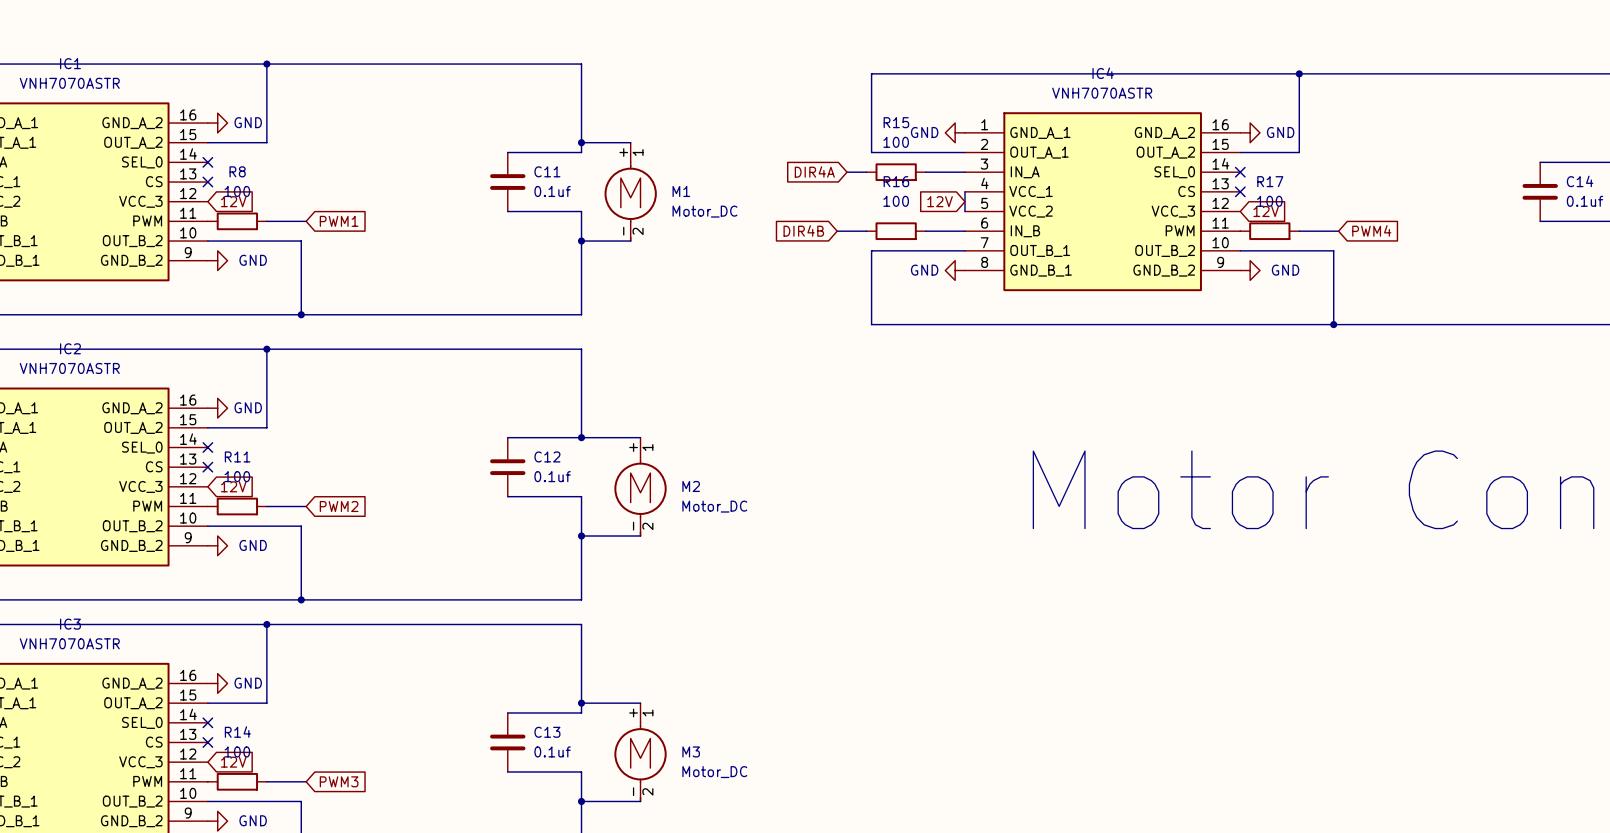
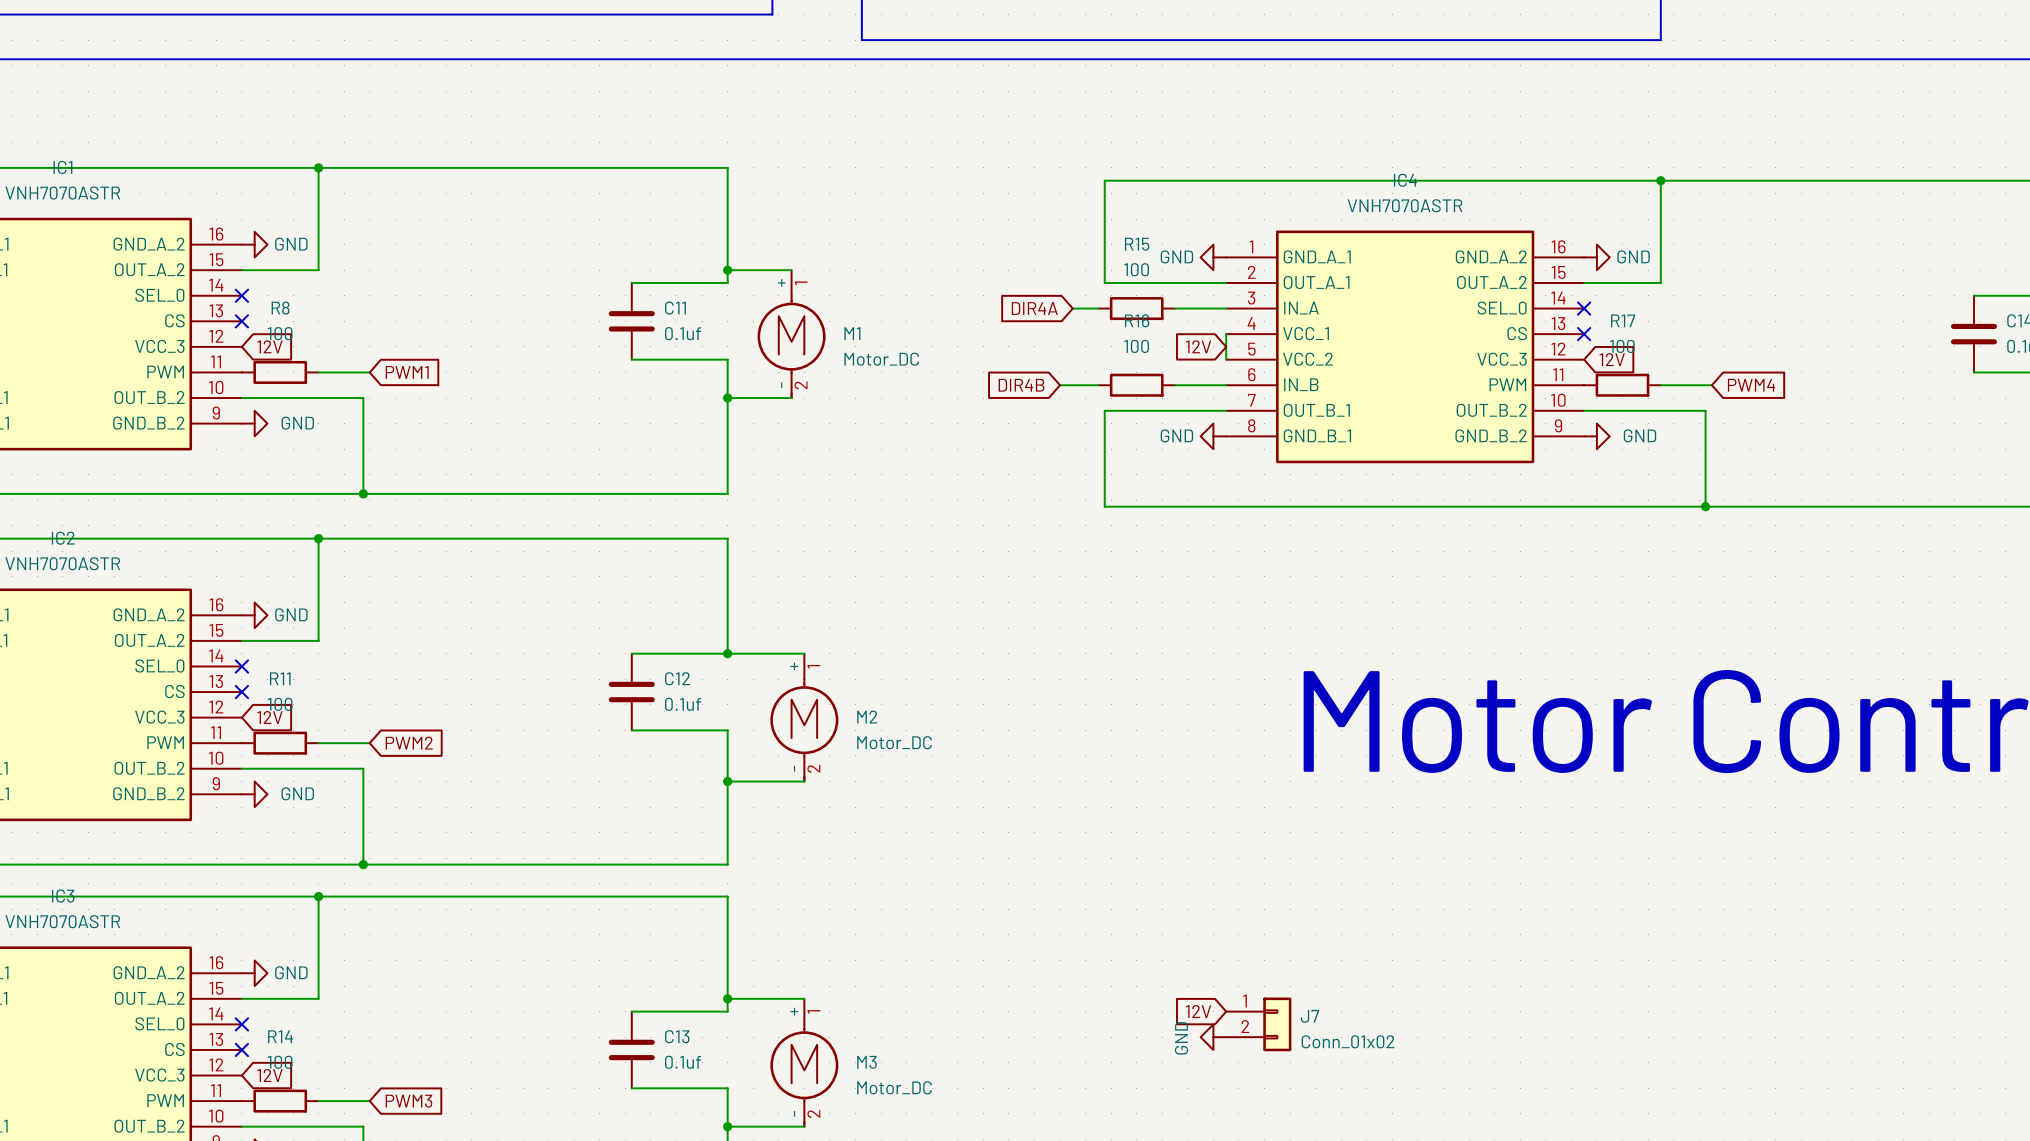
global label: none -> 12V (1198, 1011)
J7: none -> Conn_01x02 (1258, 1024)
power symbol: none -> GND (1213, 1037)

